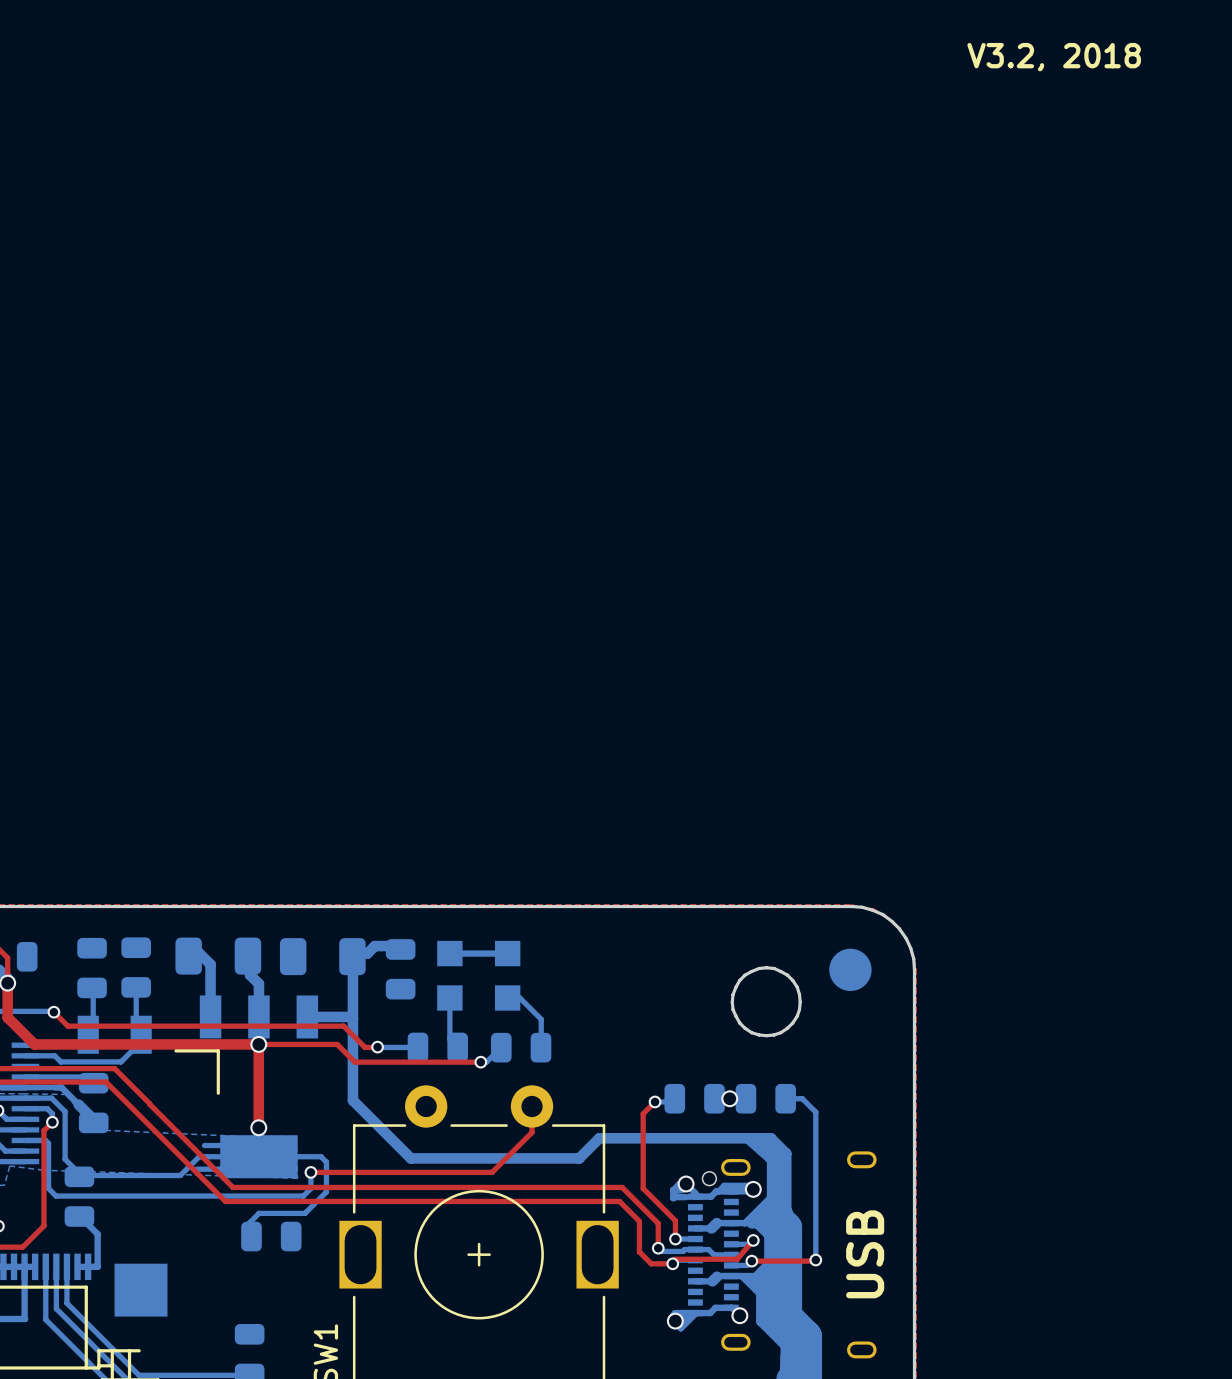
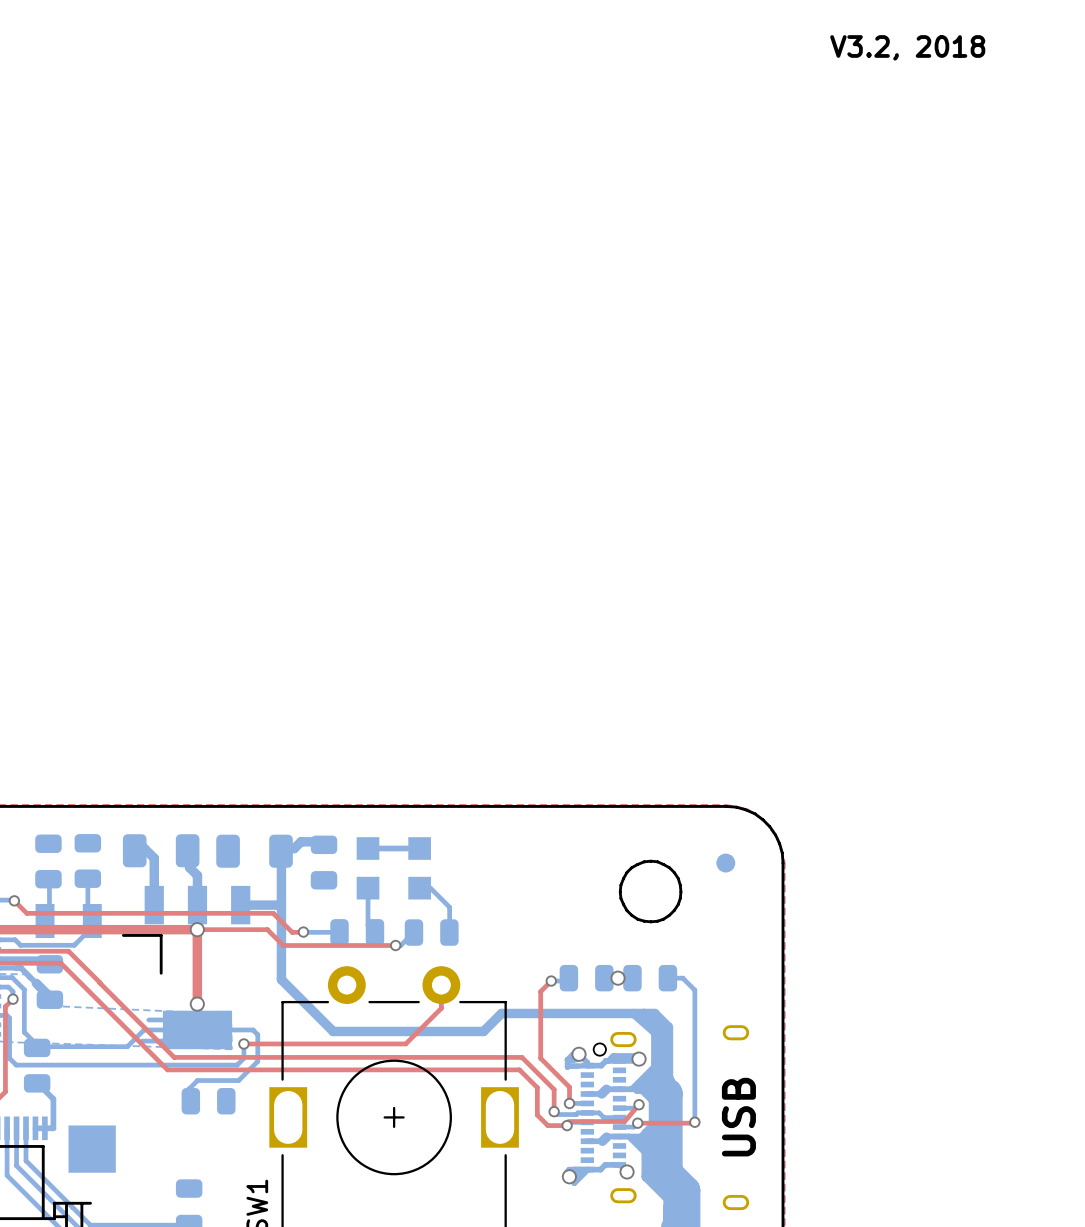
part footprint: [829, 948, 872, 992] -> [716, 853, 736, 873]

